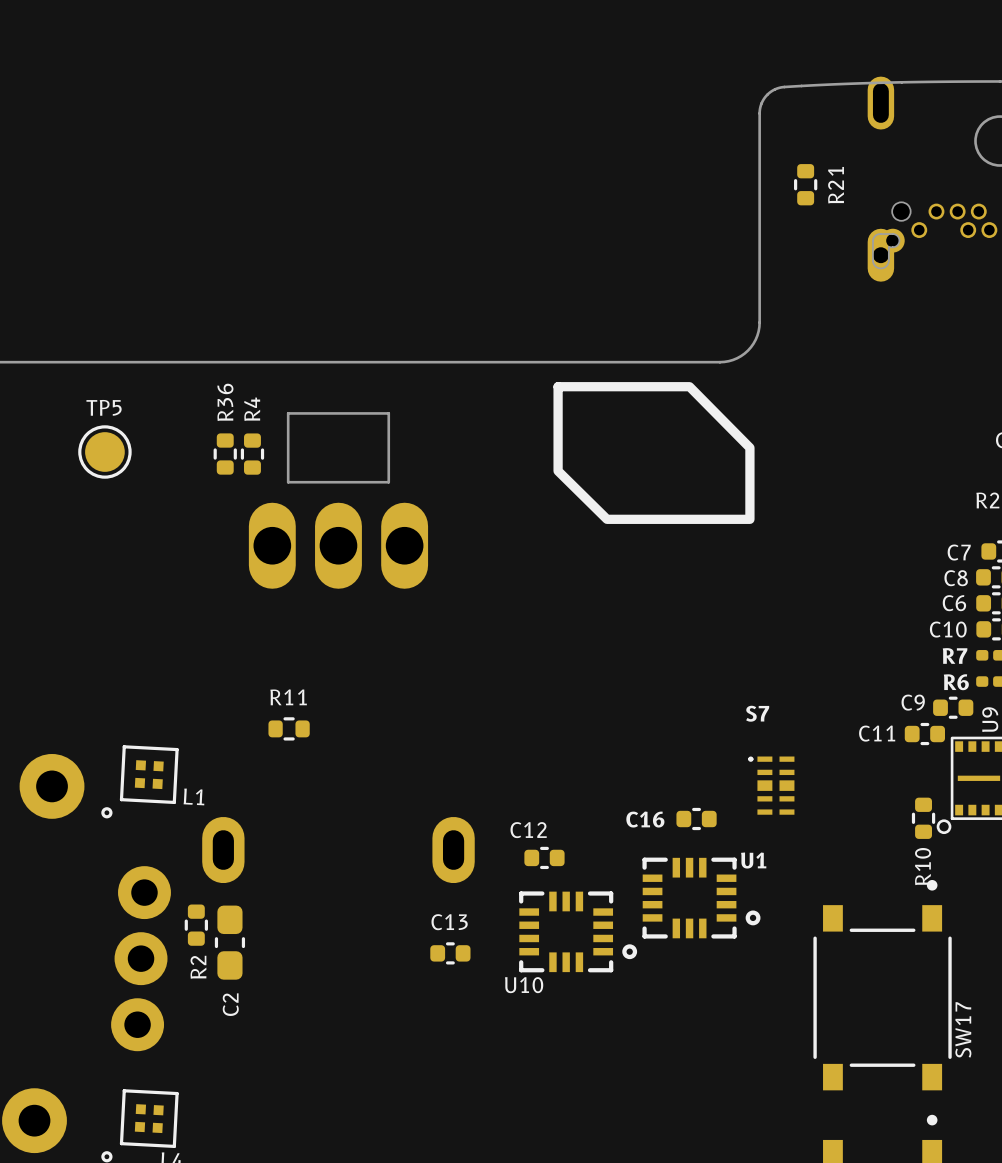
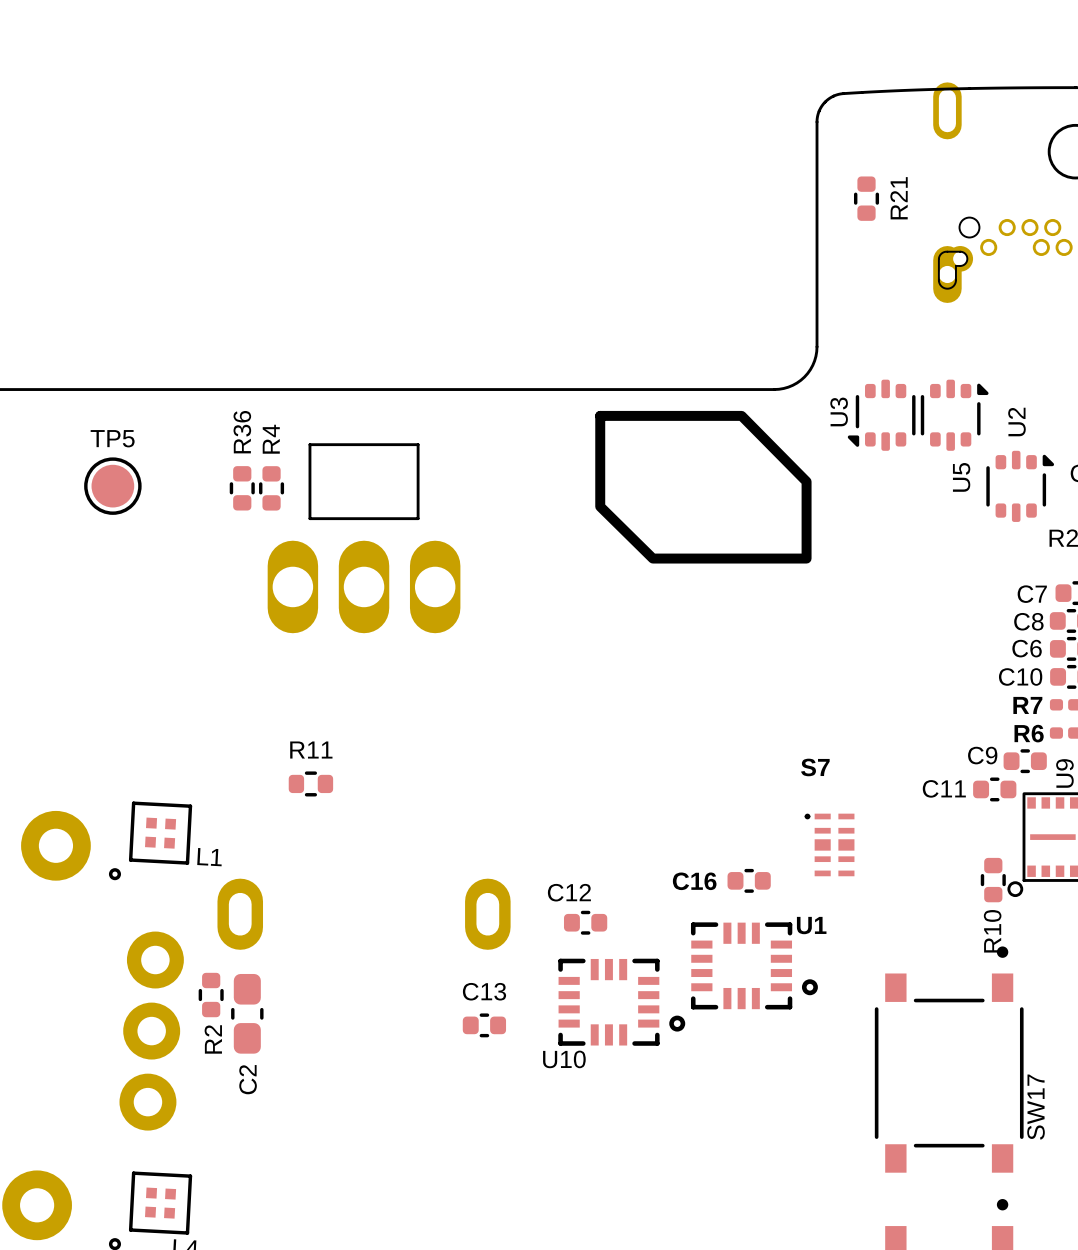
U3: none -> (881, 415)
U5: none -> (954, 415)
U2: none -> (1020, 486)

